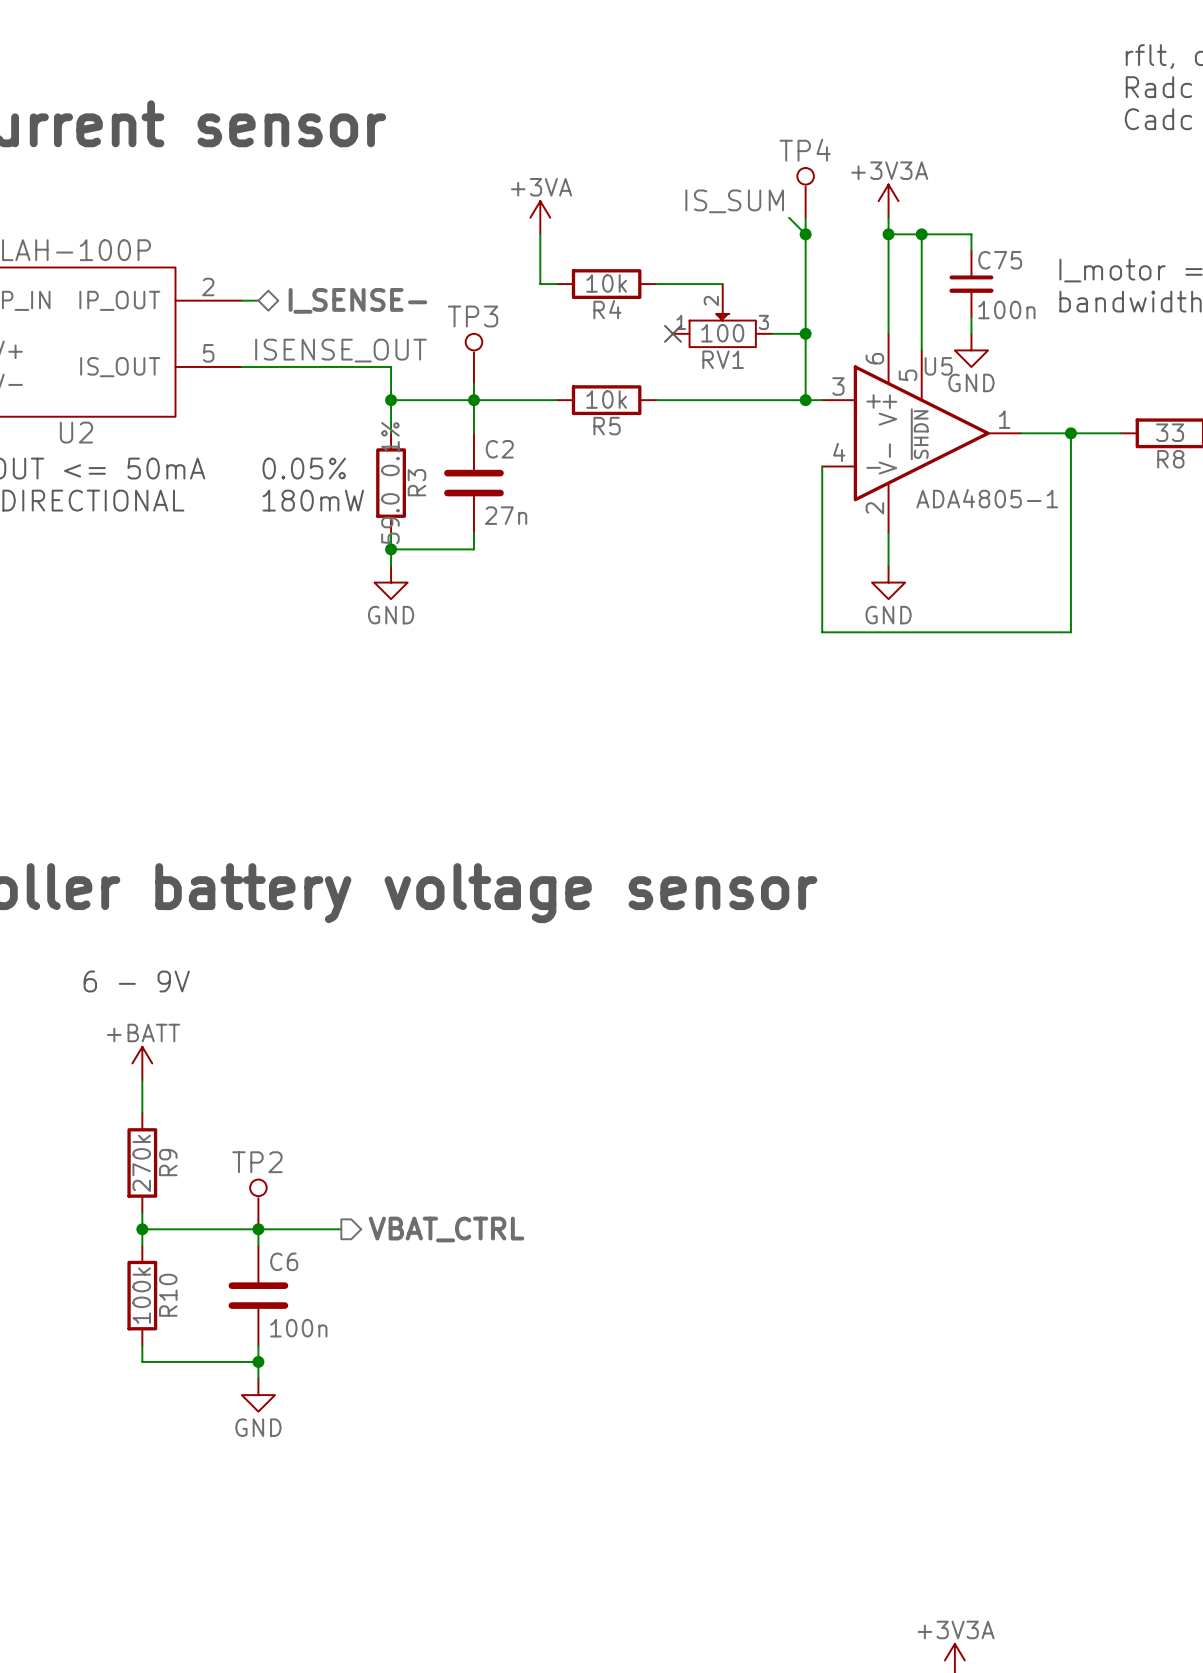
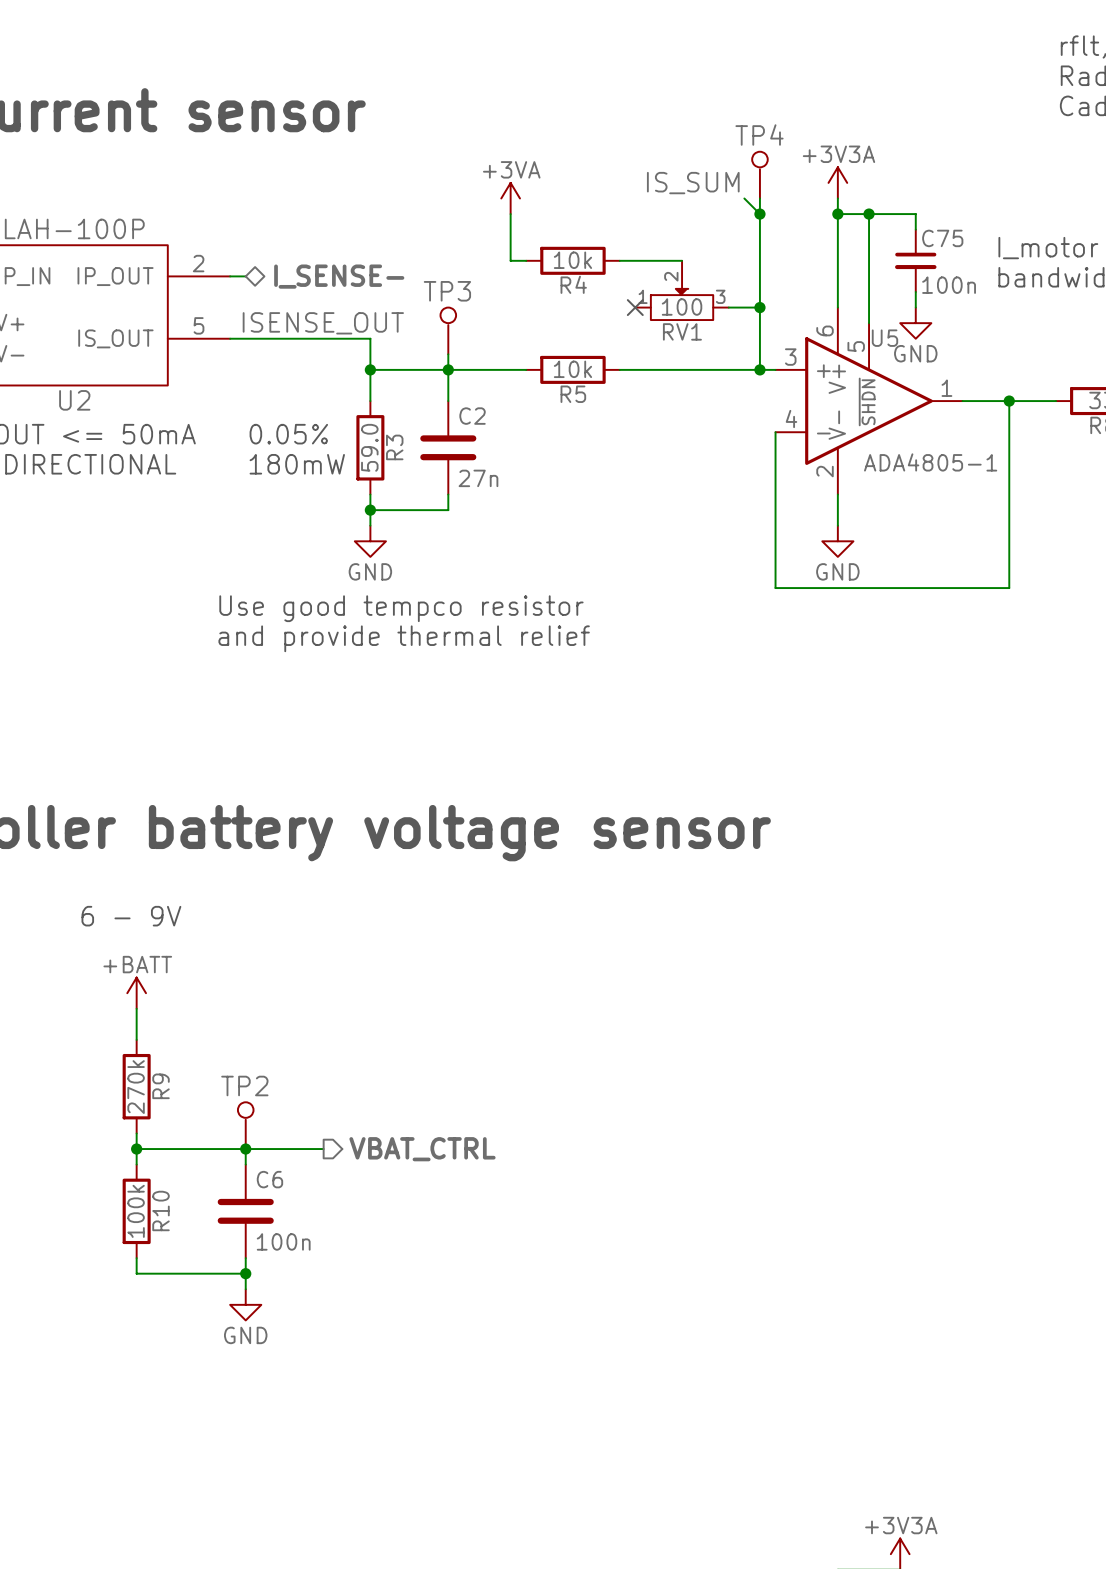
R3 value: 59.0 0.1% (390, 483) -> 59.0 (369, 447)
text: none -> Use good tempco resistor (401, 608)
text: none -> and provide thermal relief (404, 638)

